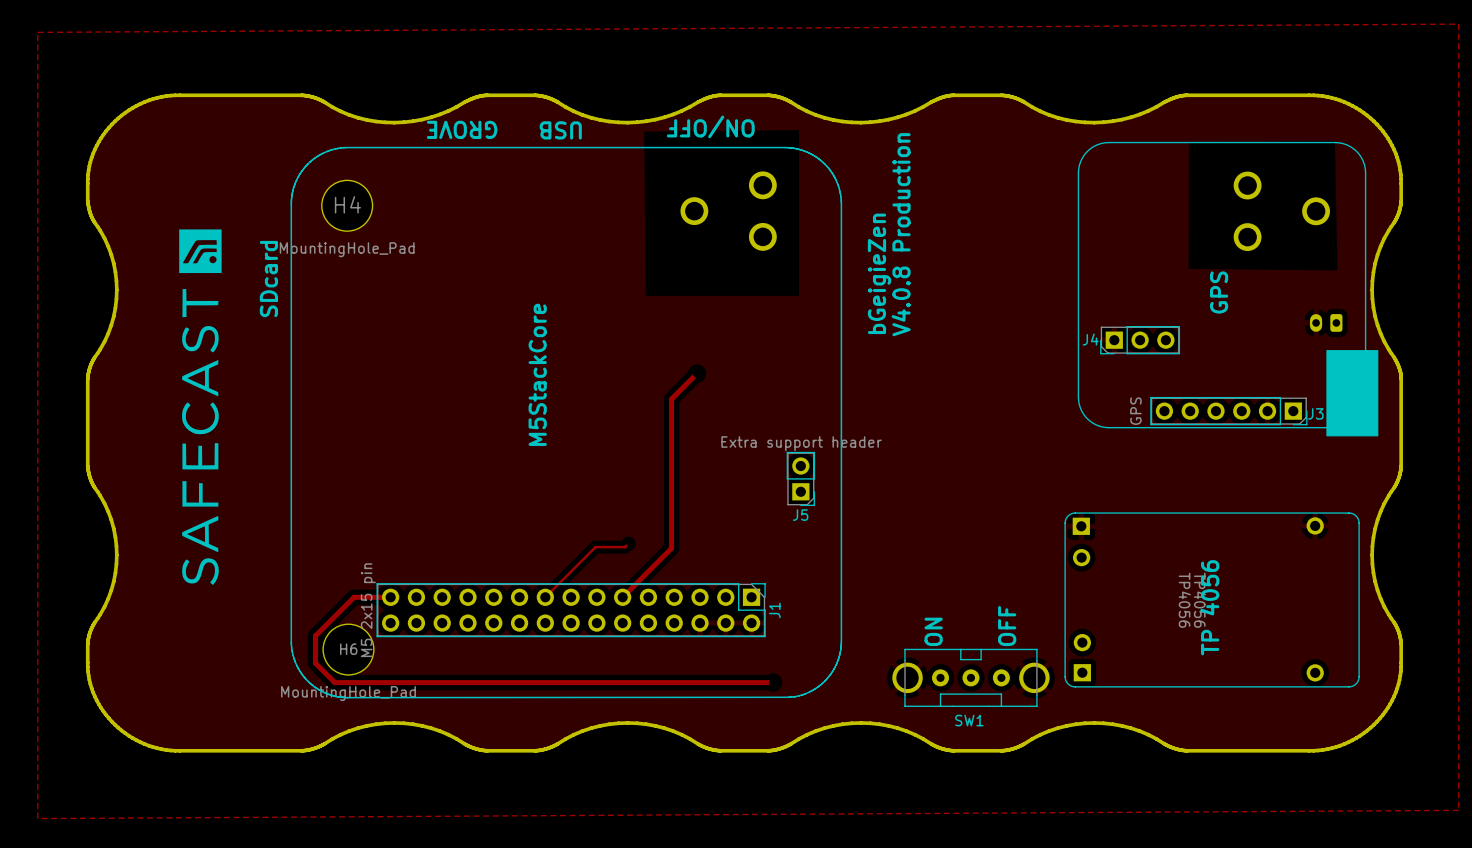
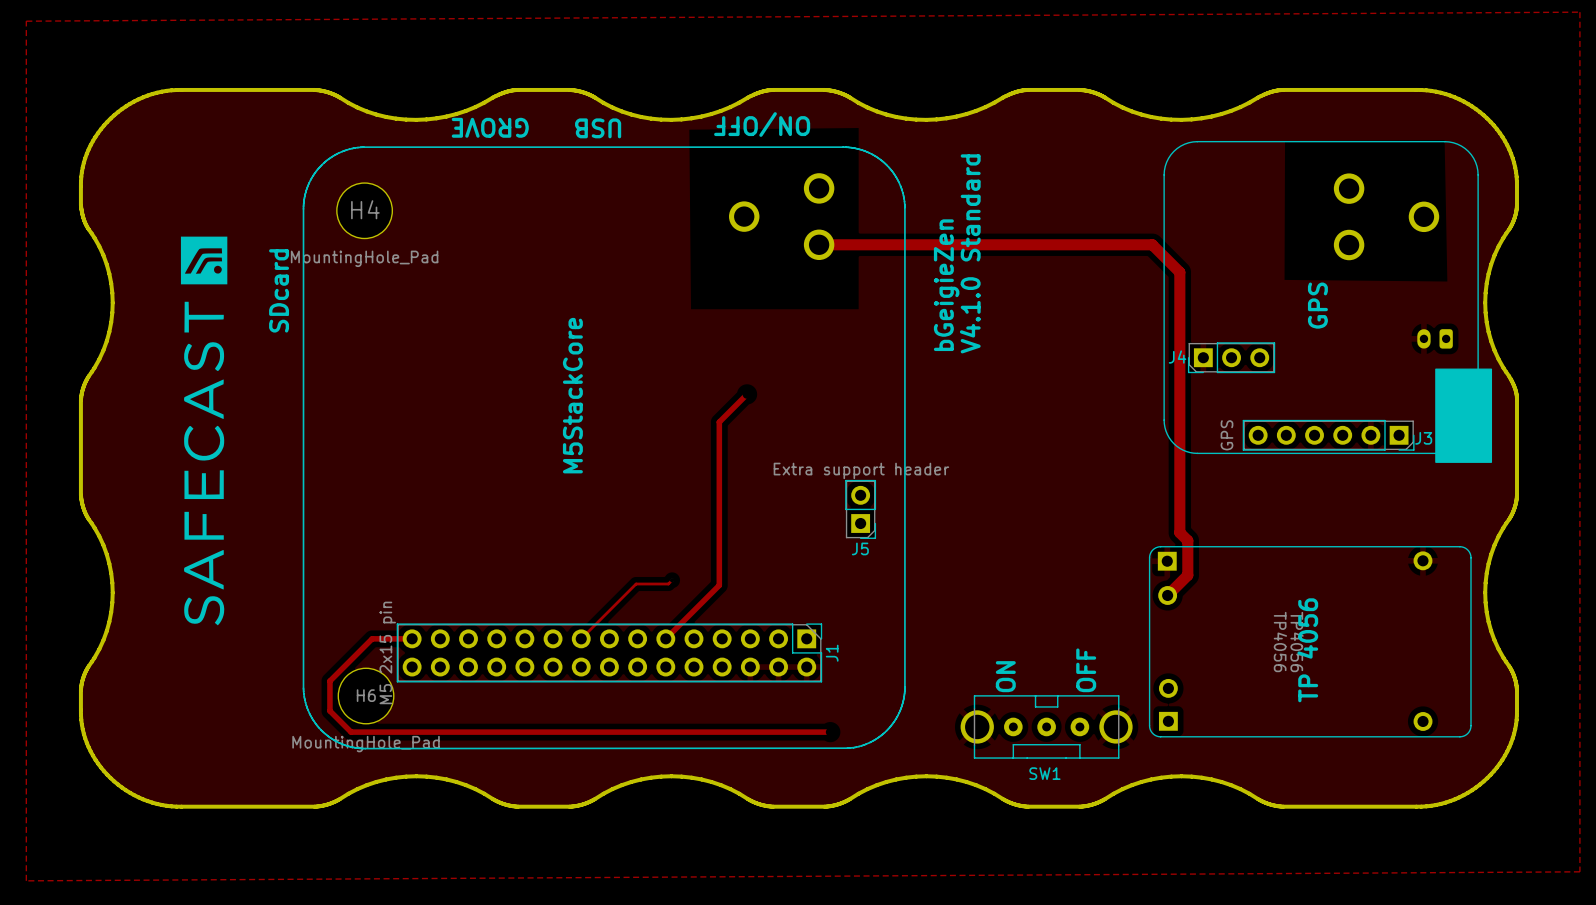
text: V4.0.8 Production (901, 234) -> V4.1.0 Standard (970, 253)
track: none -> (819, 244) (1152, 244) (1179, 272) (1179, 532) (1187, 540) (1187, 575) (1167, 595)

